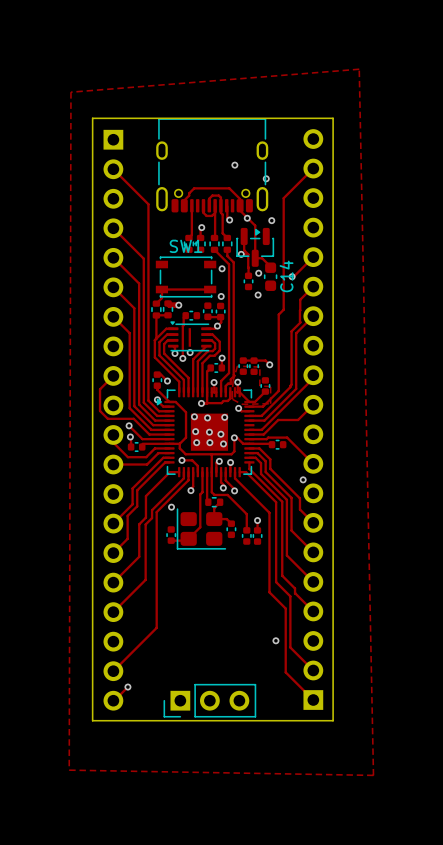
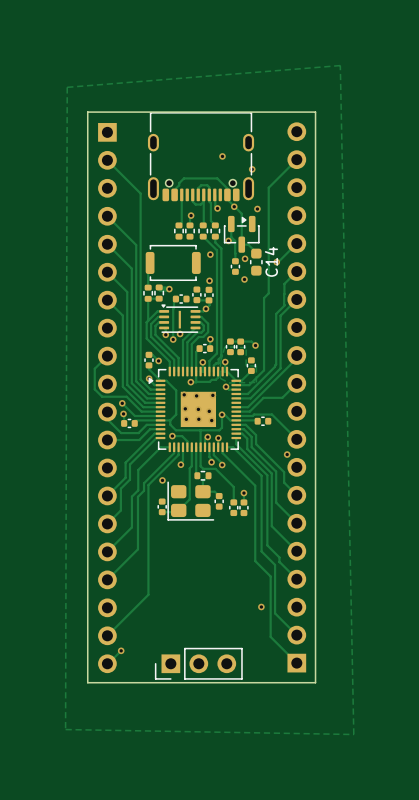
part: none -> (173, 262)
SW1: (186, 277) -> none
track: (210, 289) (161, 289) (161, 298) (156, 303) -> (148, 264) (148, 287)

